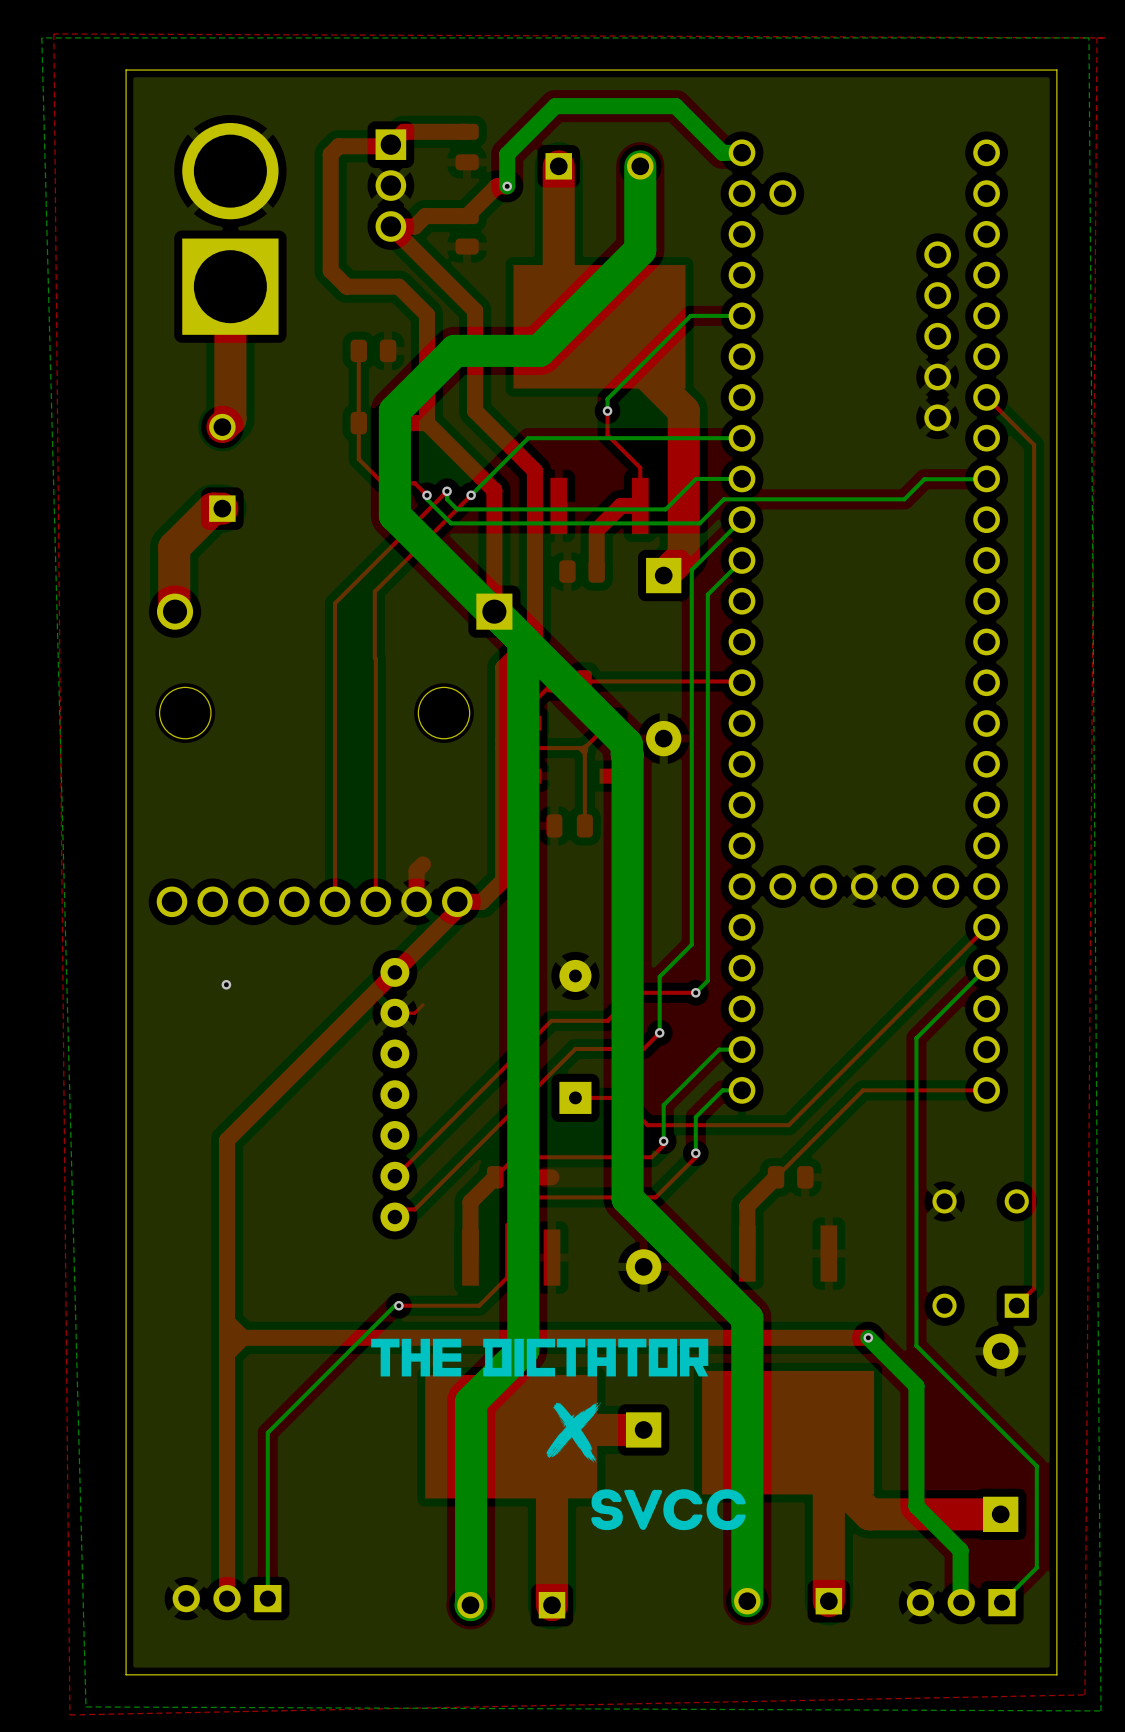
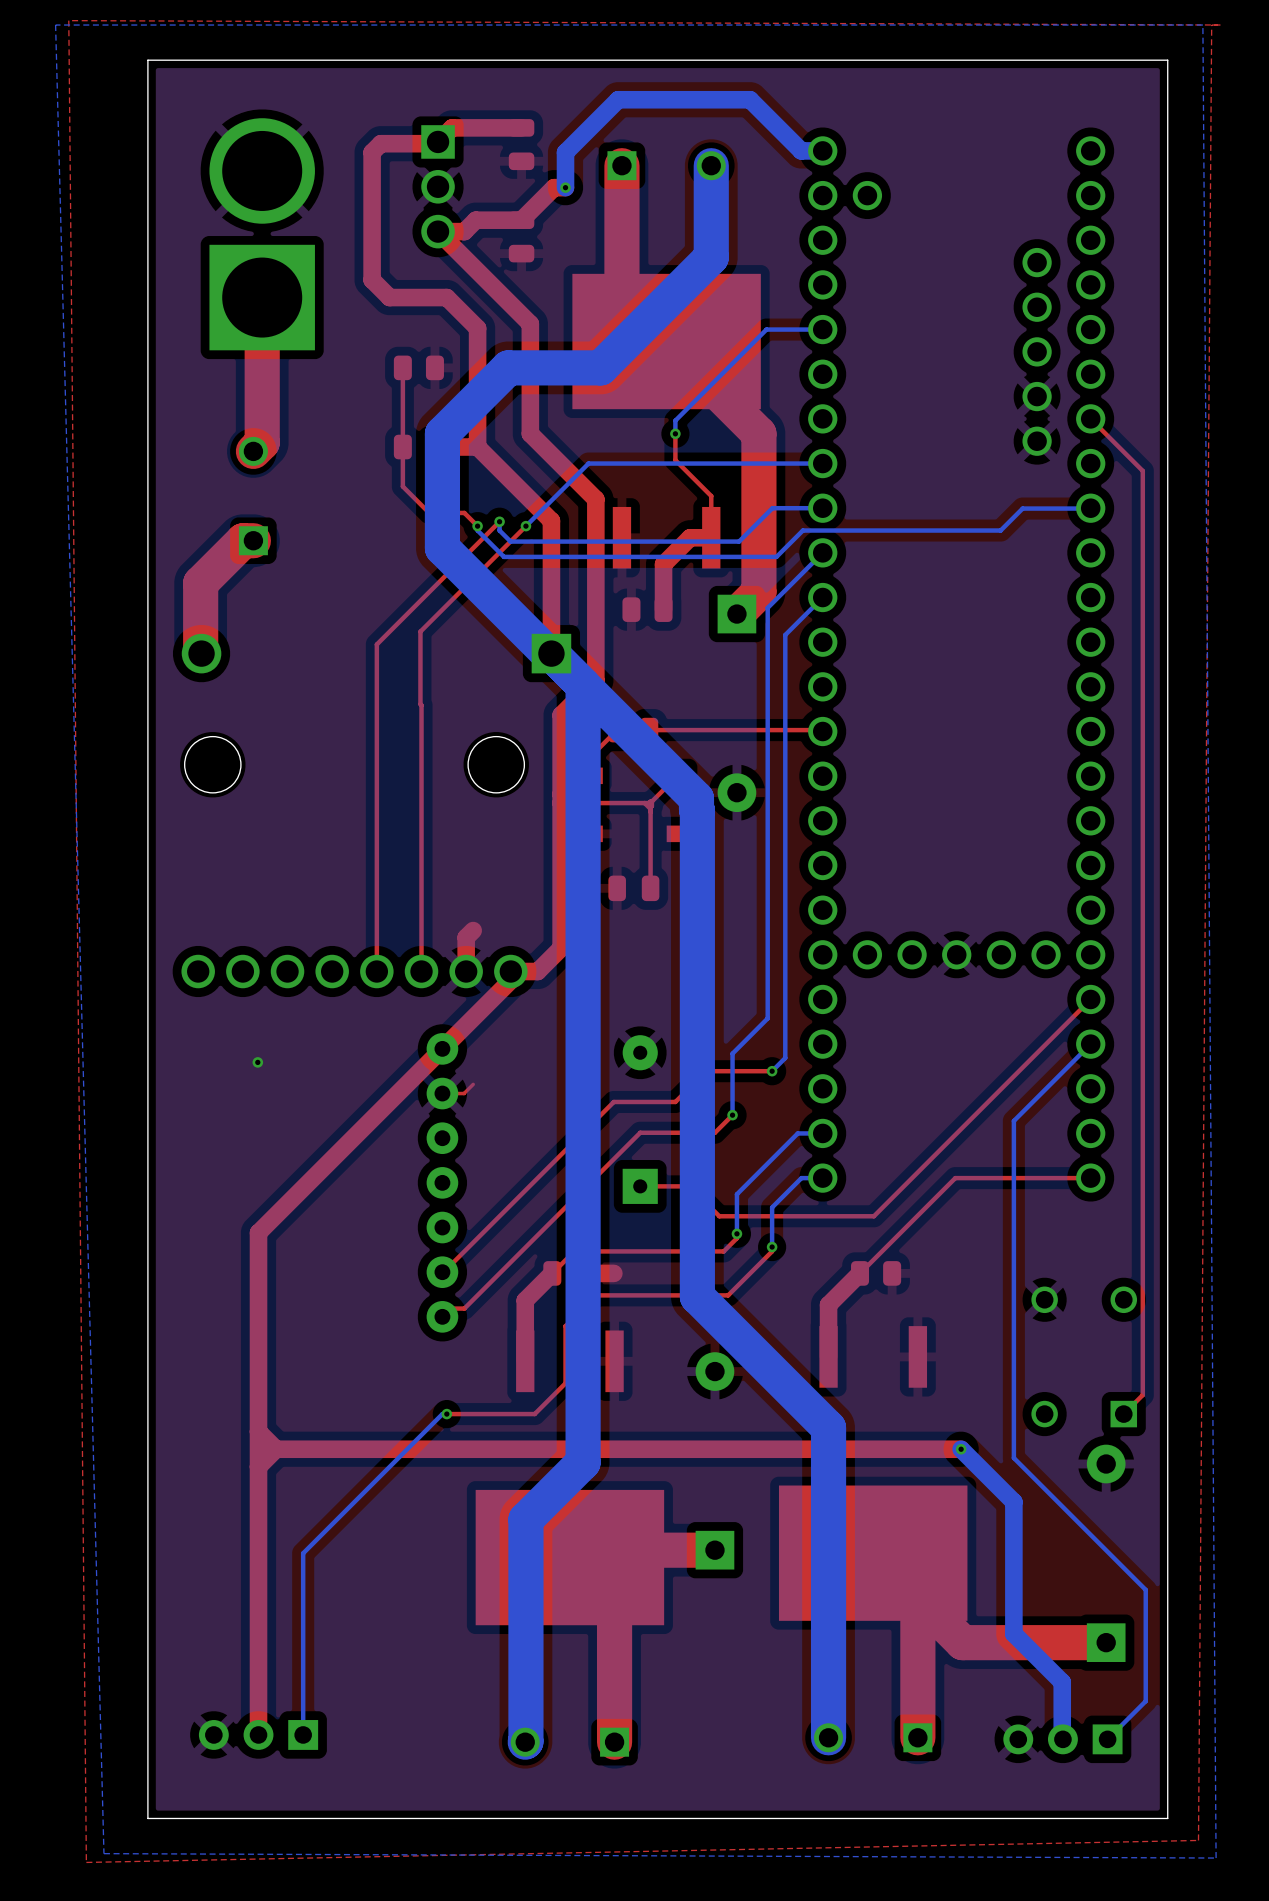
drawing: [371, 1338, 462, 1377] -> none
drawing: [483, 1338, 709, 1377] -> none
drawing: [546, 1402, 602, 1464] -> none
drawing: [591, 1489, 746, 1531] -> none

